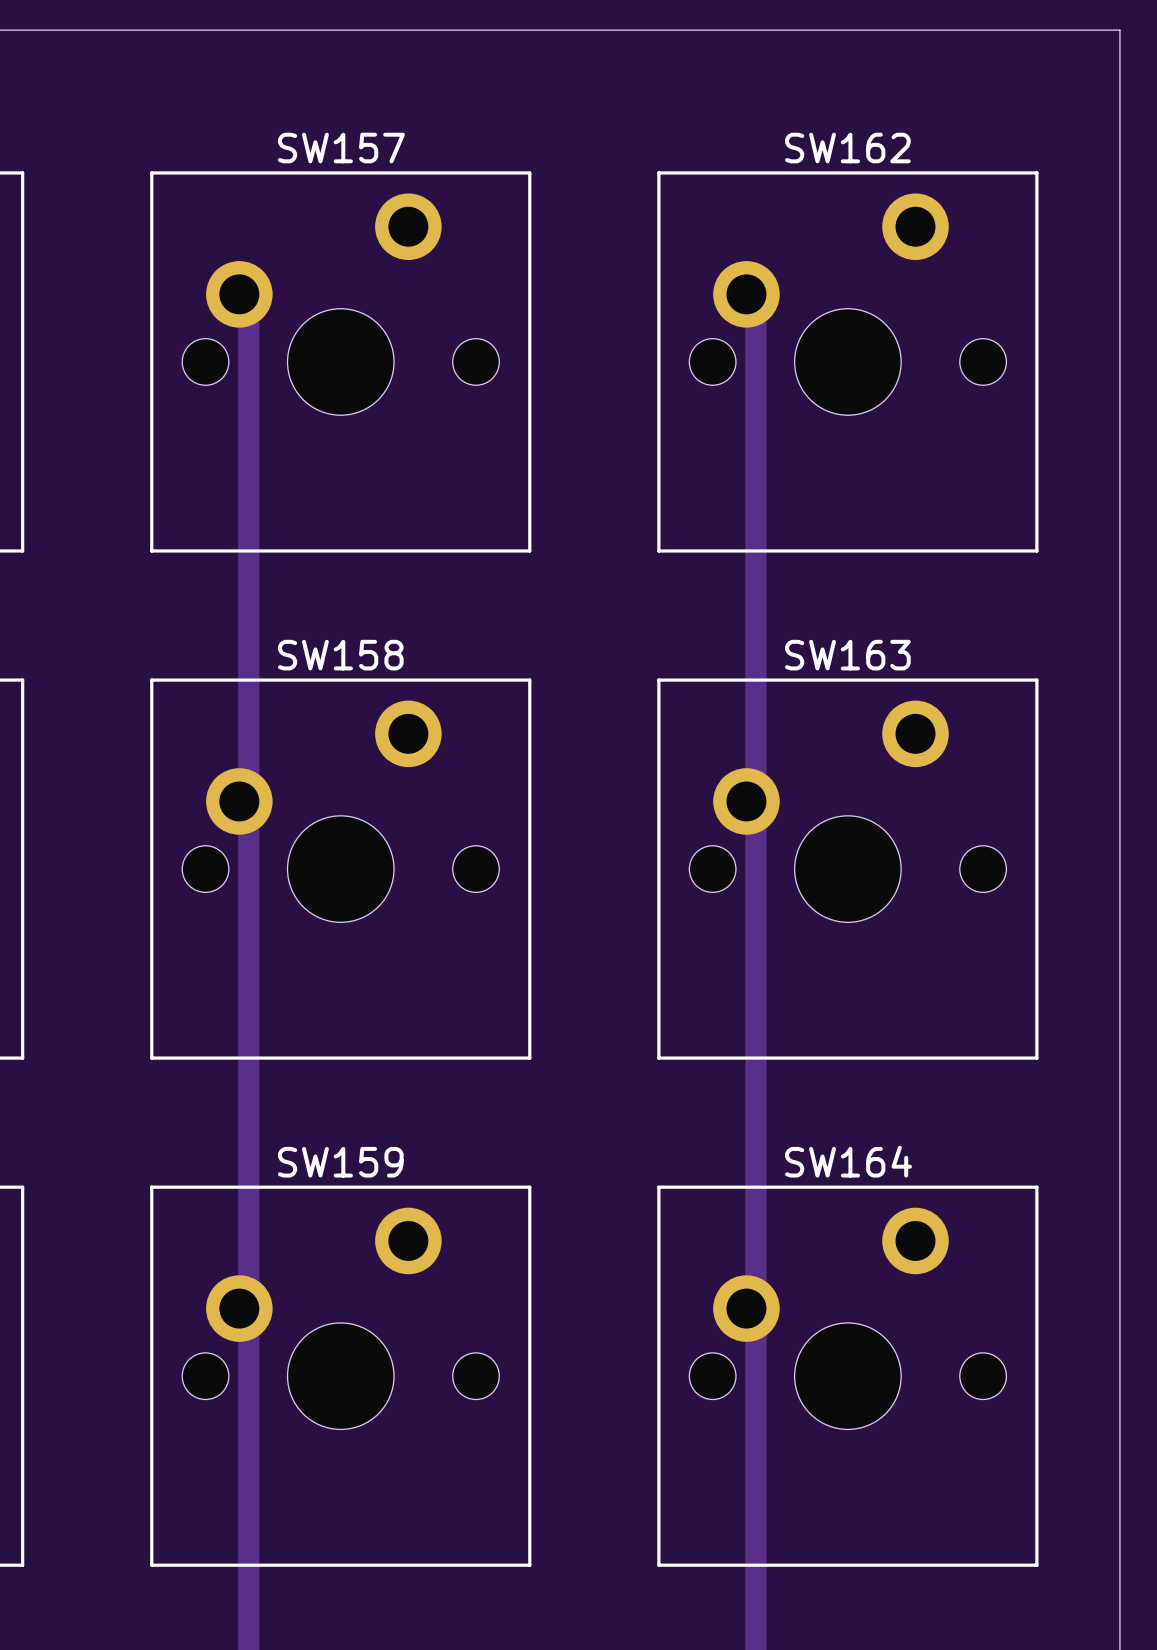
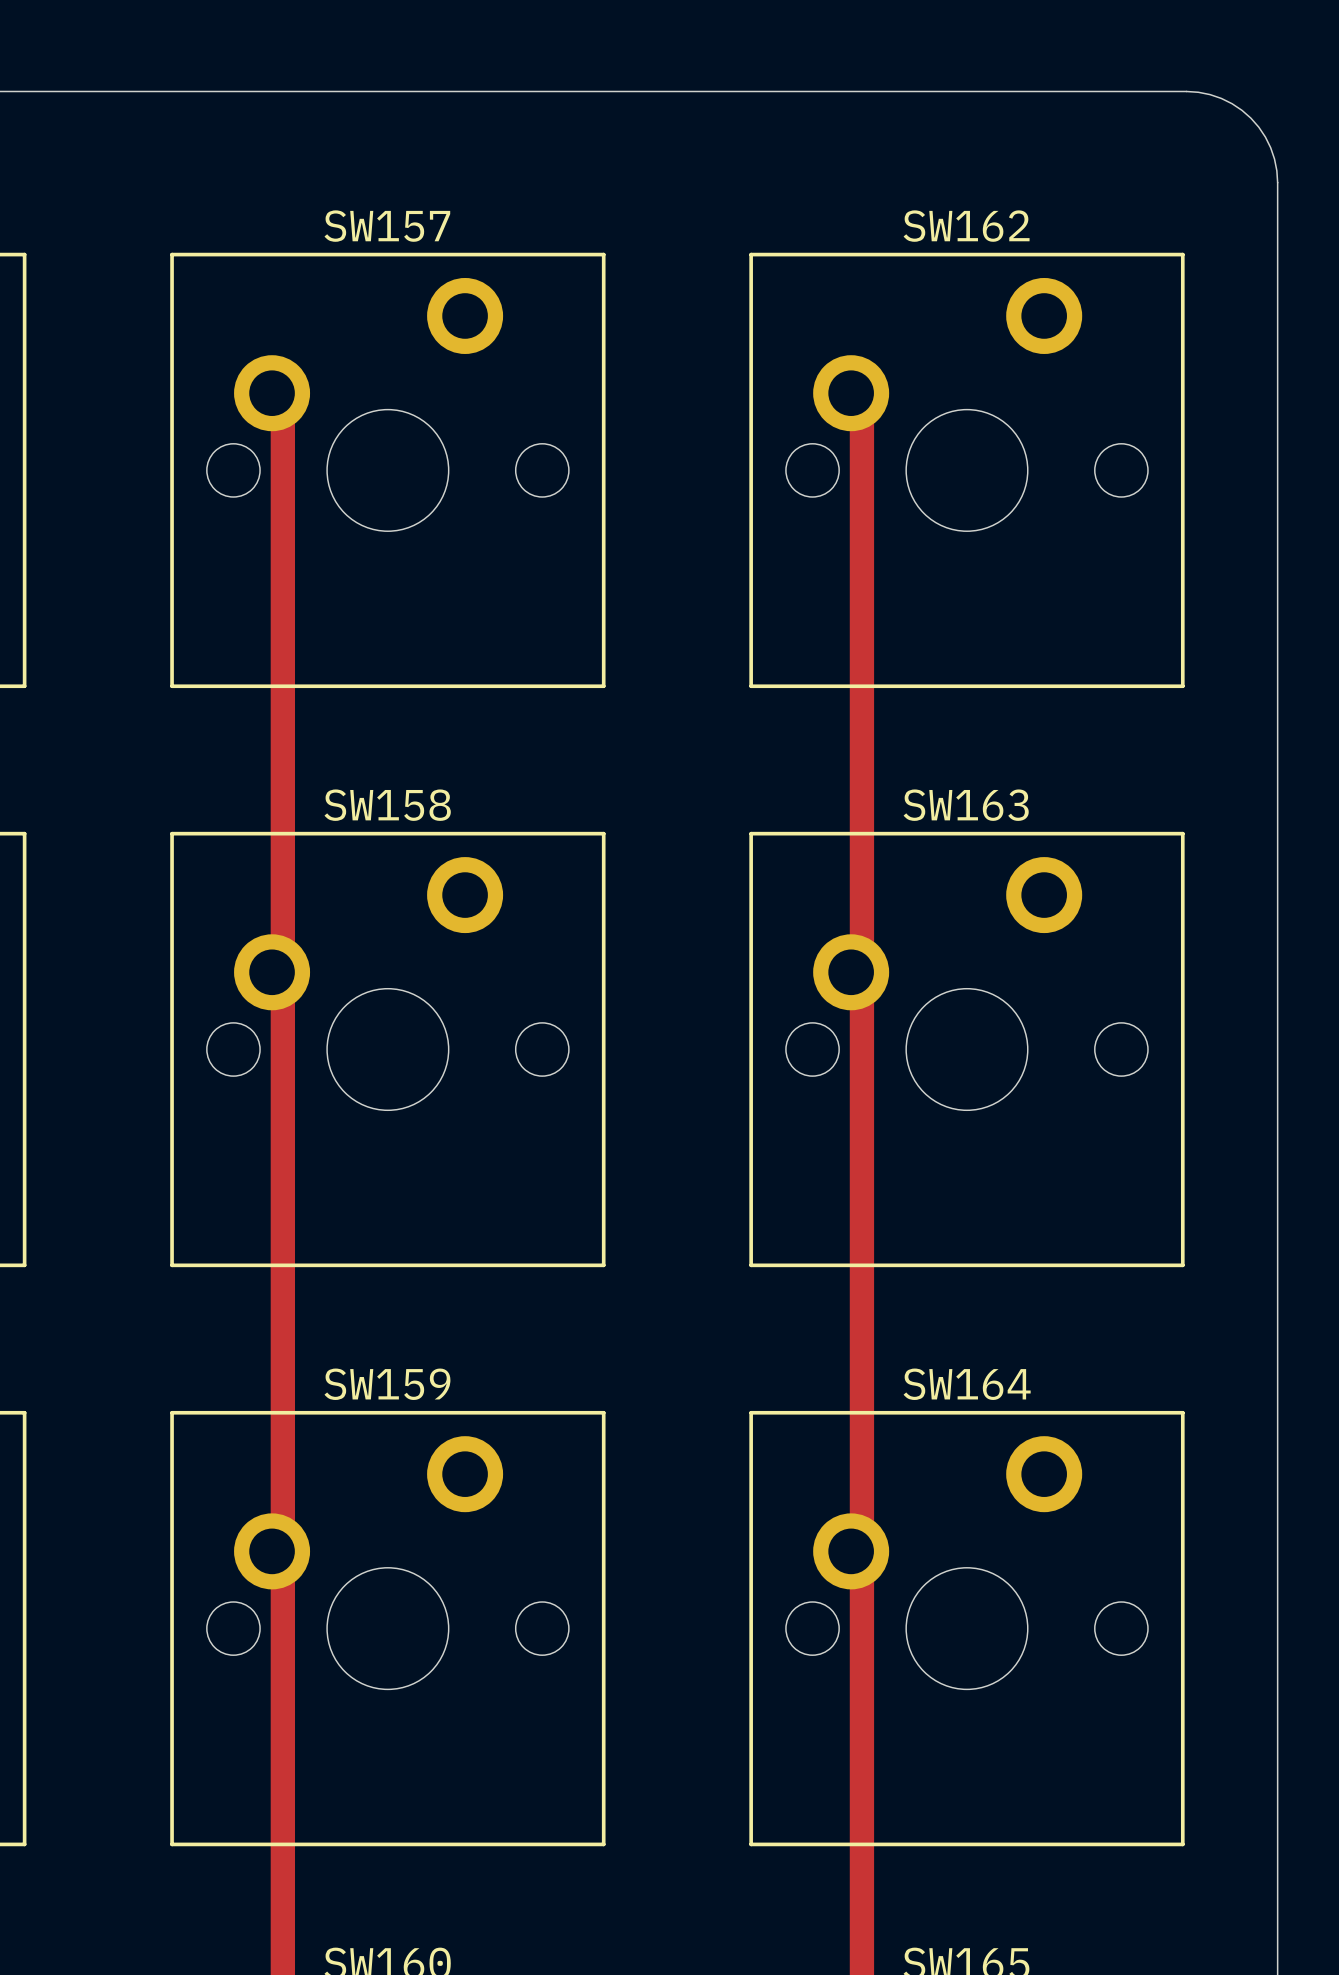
board edge: (1040, 30) (1119, 30) (1119, 110) -> (1186, 91) (1210, 94) (1221, 98) (1241, 110) (1250, 118) (1258, 127) (1270, 147) (1274, 159) (1277, 182)

